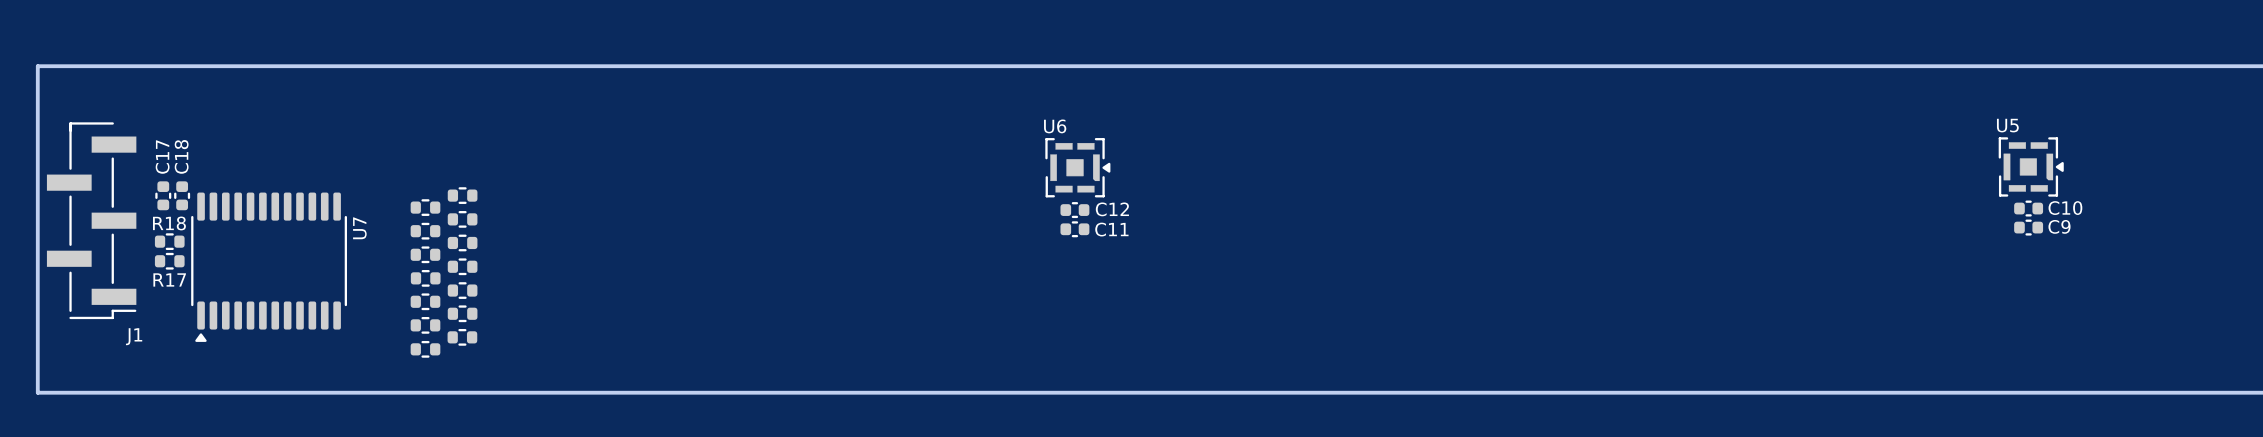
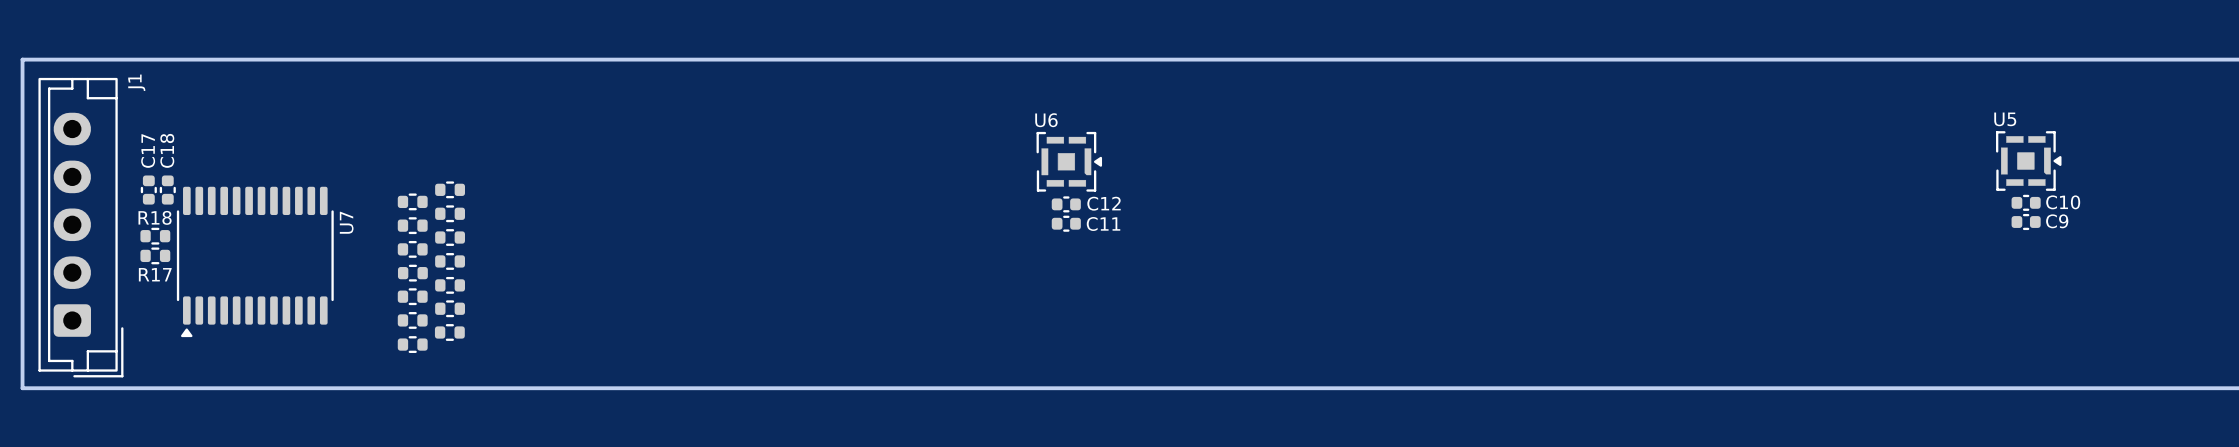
J1 footprint: [46, 122, 137, 320] -> [38, 77, 124, 378]
J1 name position: J1 (134, 336) -> J1 (136, 82)

